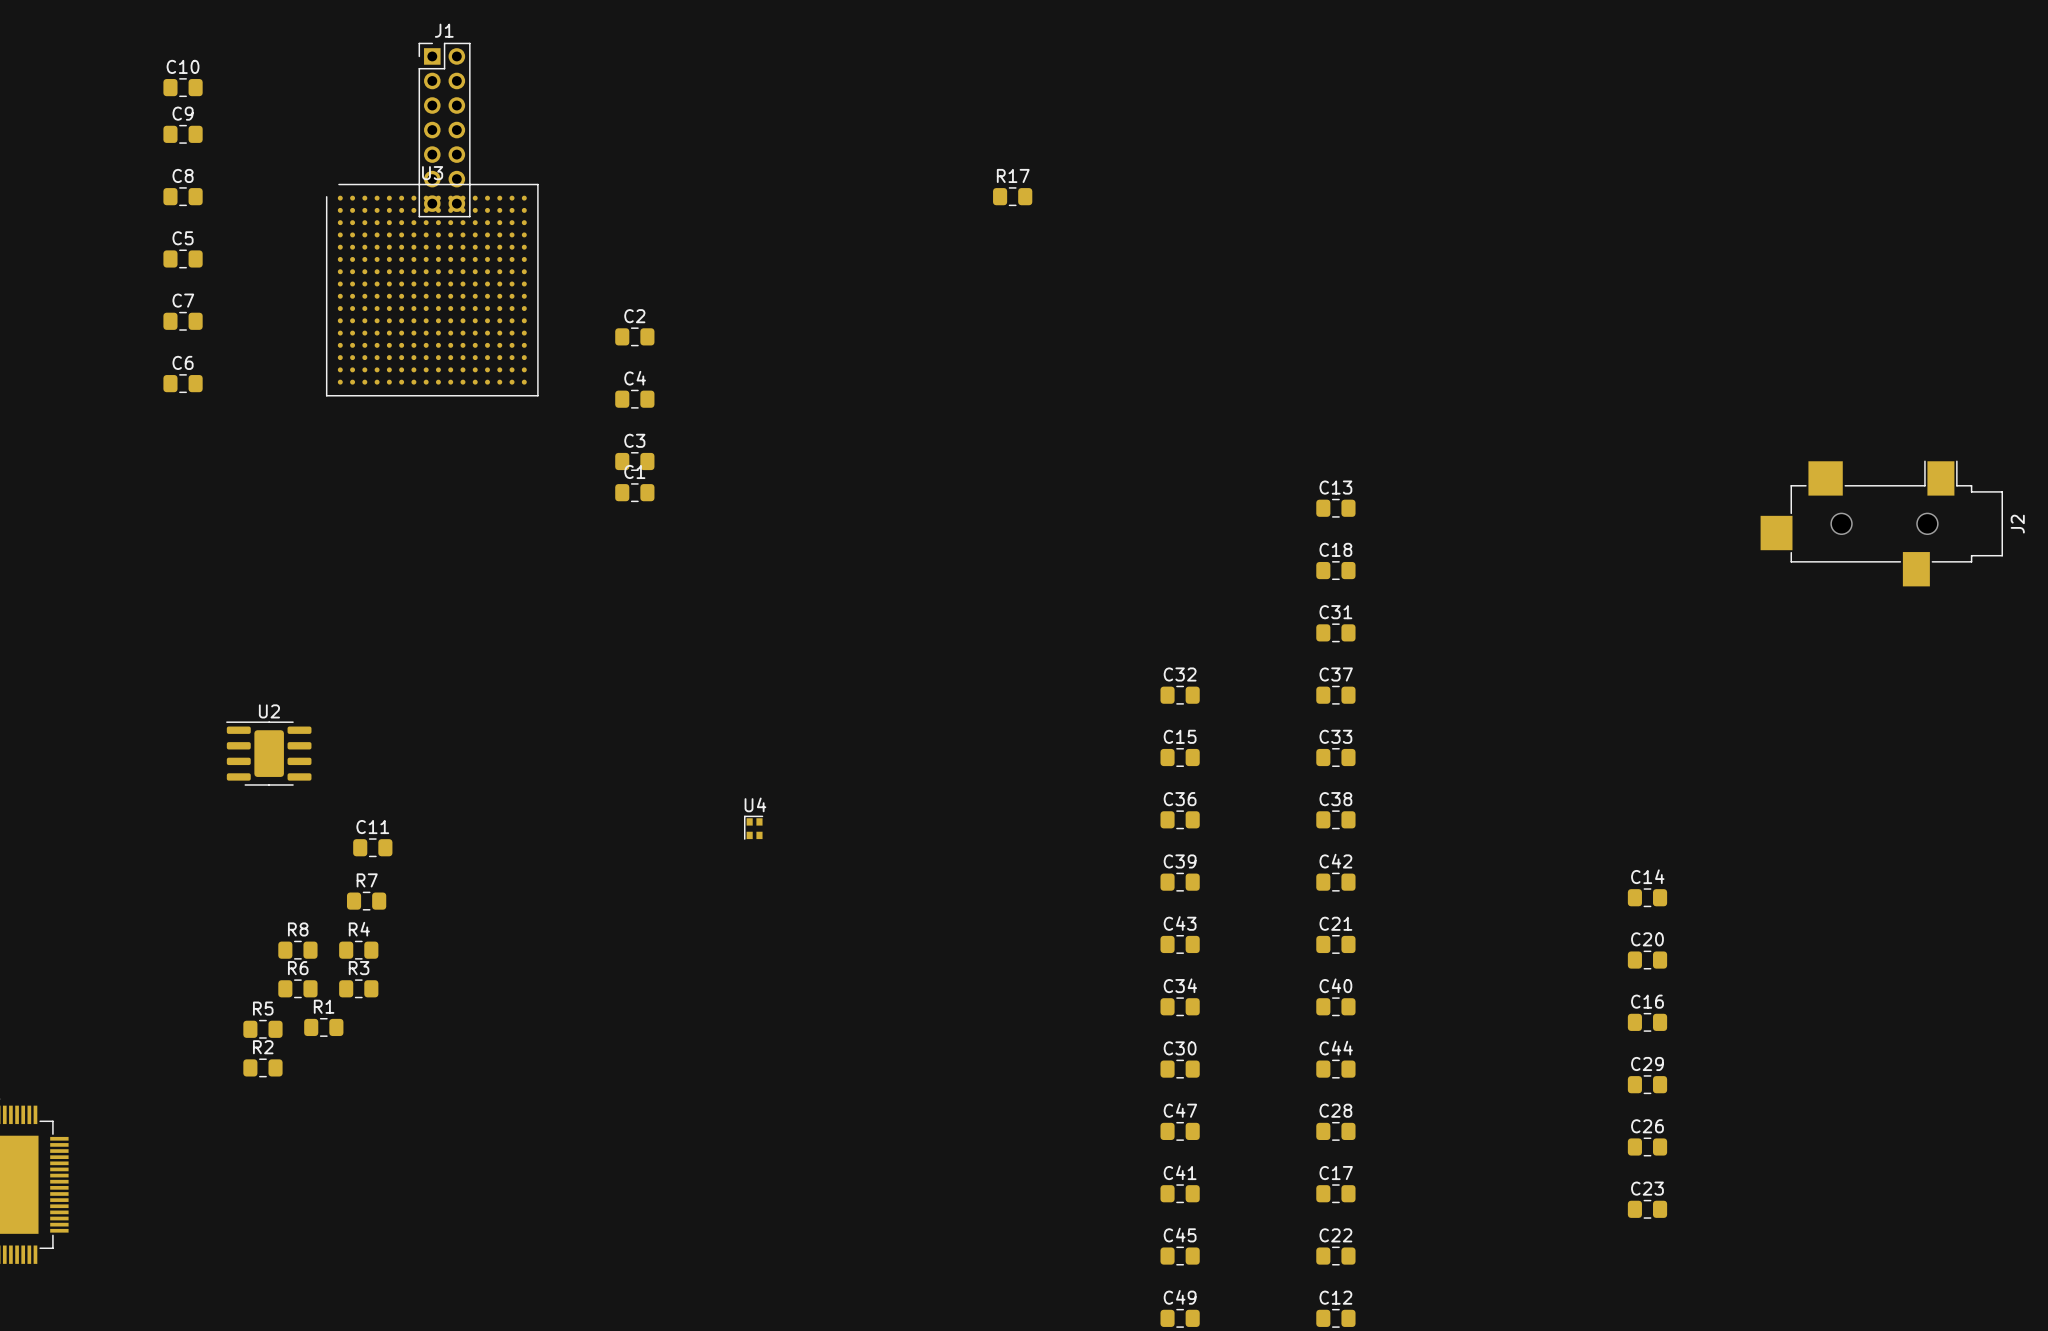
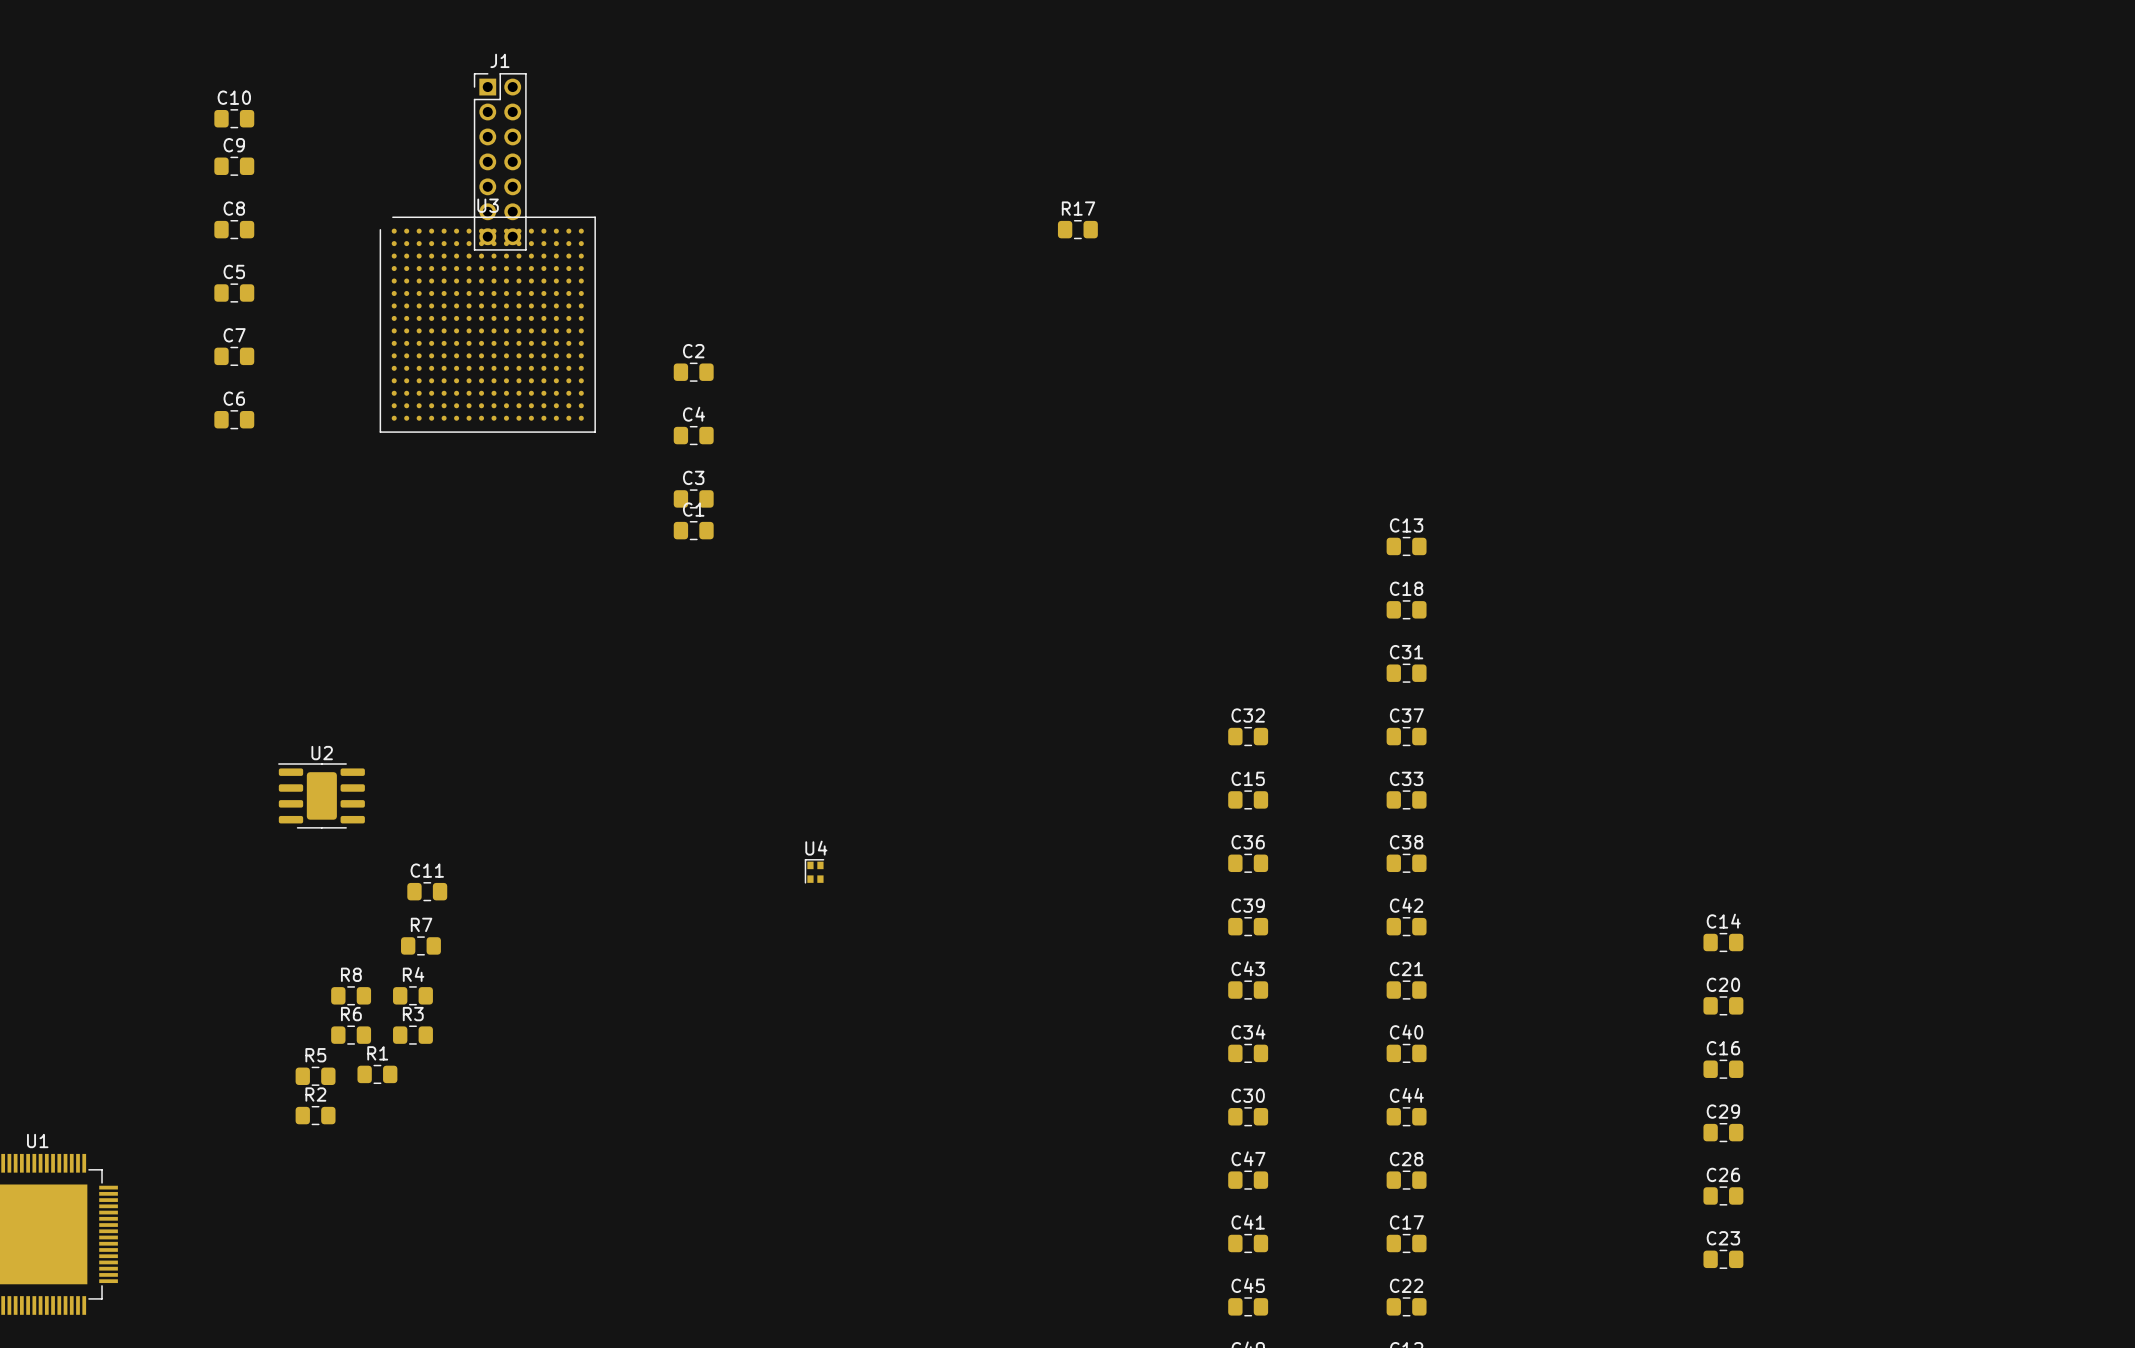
J2: (1881, 523) -> none

